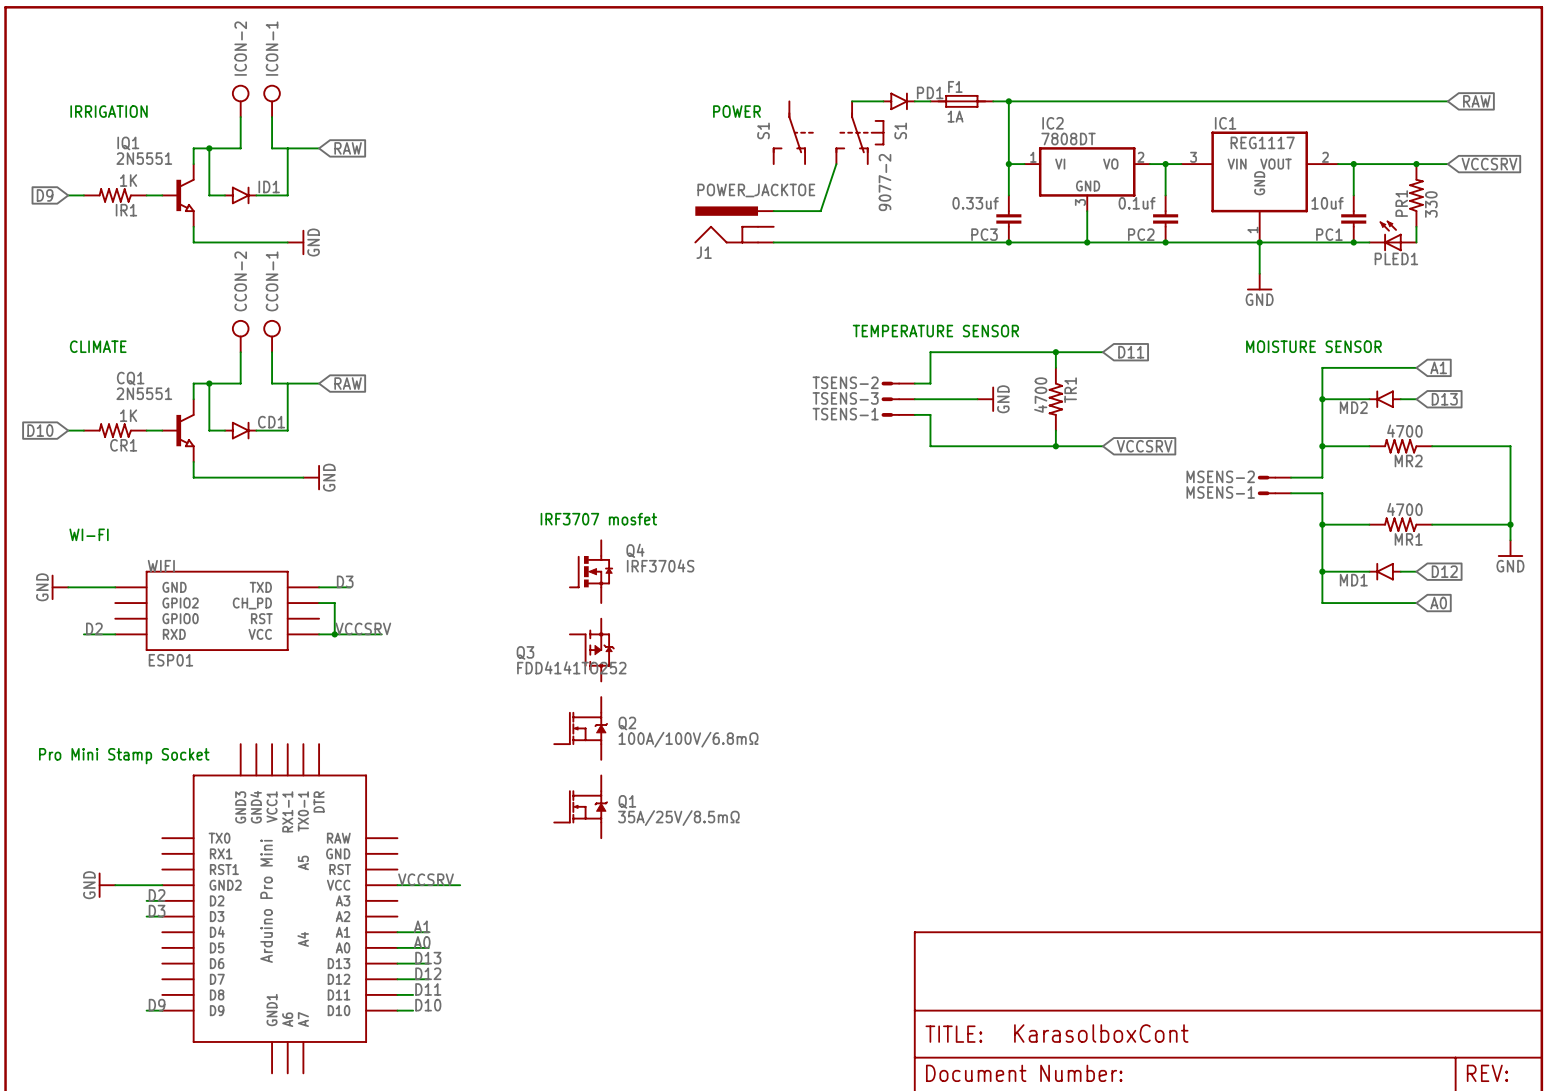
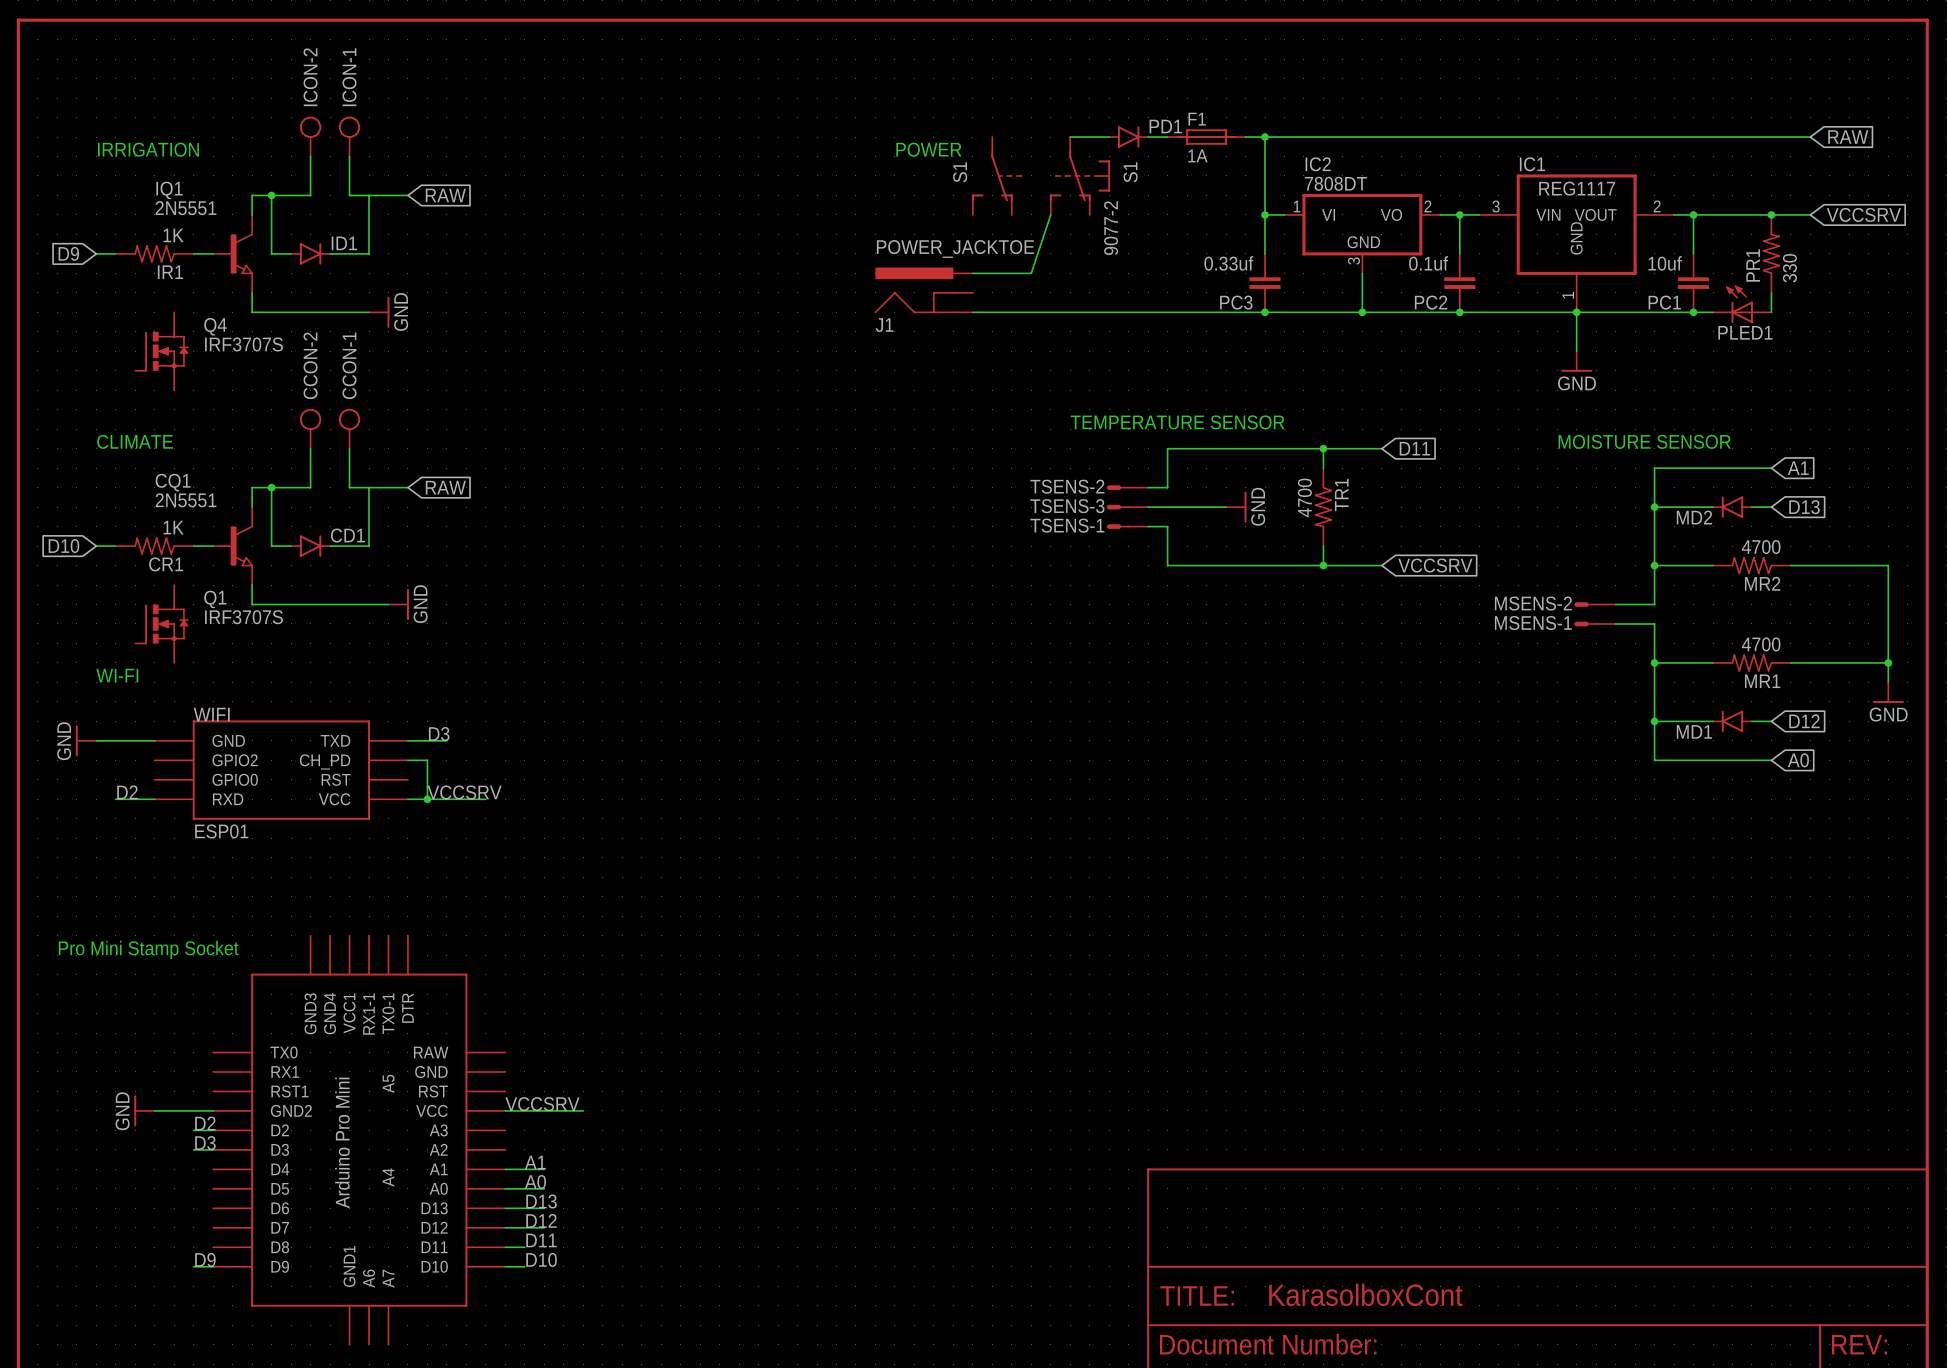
text: IRF3707 mosfet (598, 519) -> none
Q4 value: IRF3704S (660, 565) -> IRF3707S (244, 344)
Q4 position: (591, 571) -> (161, 351)
Q3: FDD4141TO252 (592, 650) -> none
Q2: 100A/100V/6.8mΩ (580, 728) -> none
Q1 symbol: [554, 775, 608, 839] -> [134, 585, 189, 663]
Q1 name position: Q1 (627, 801) -> Q1 (215, 599)
Q1 value: 35A/25V/8.5mΩ (678, 818) -> IRF3707S (244, 617)

